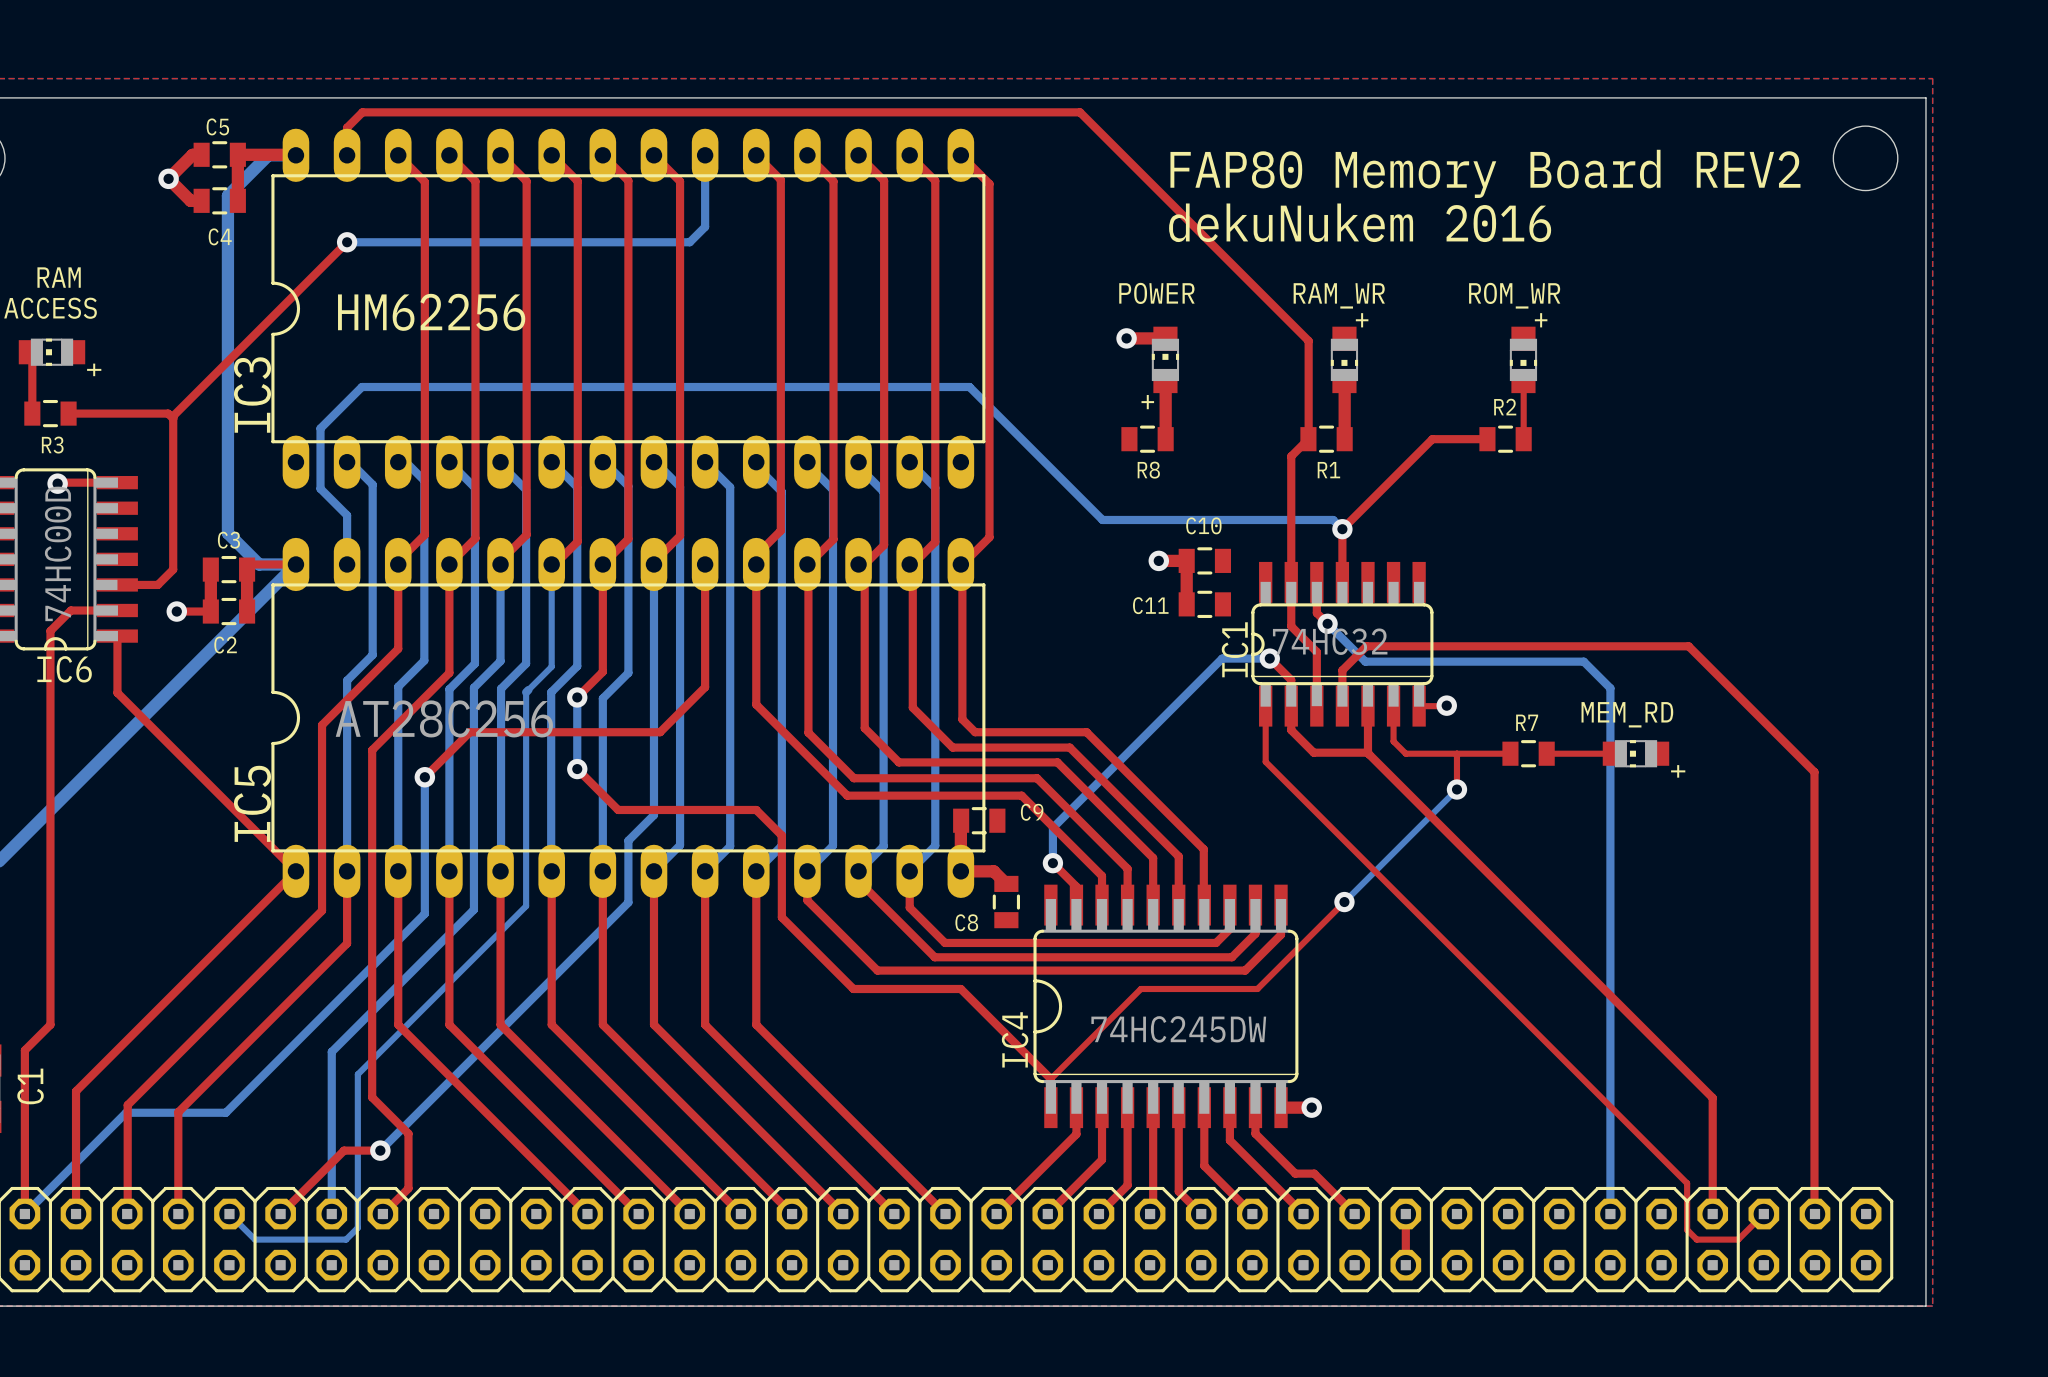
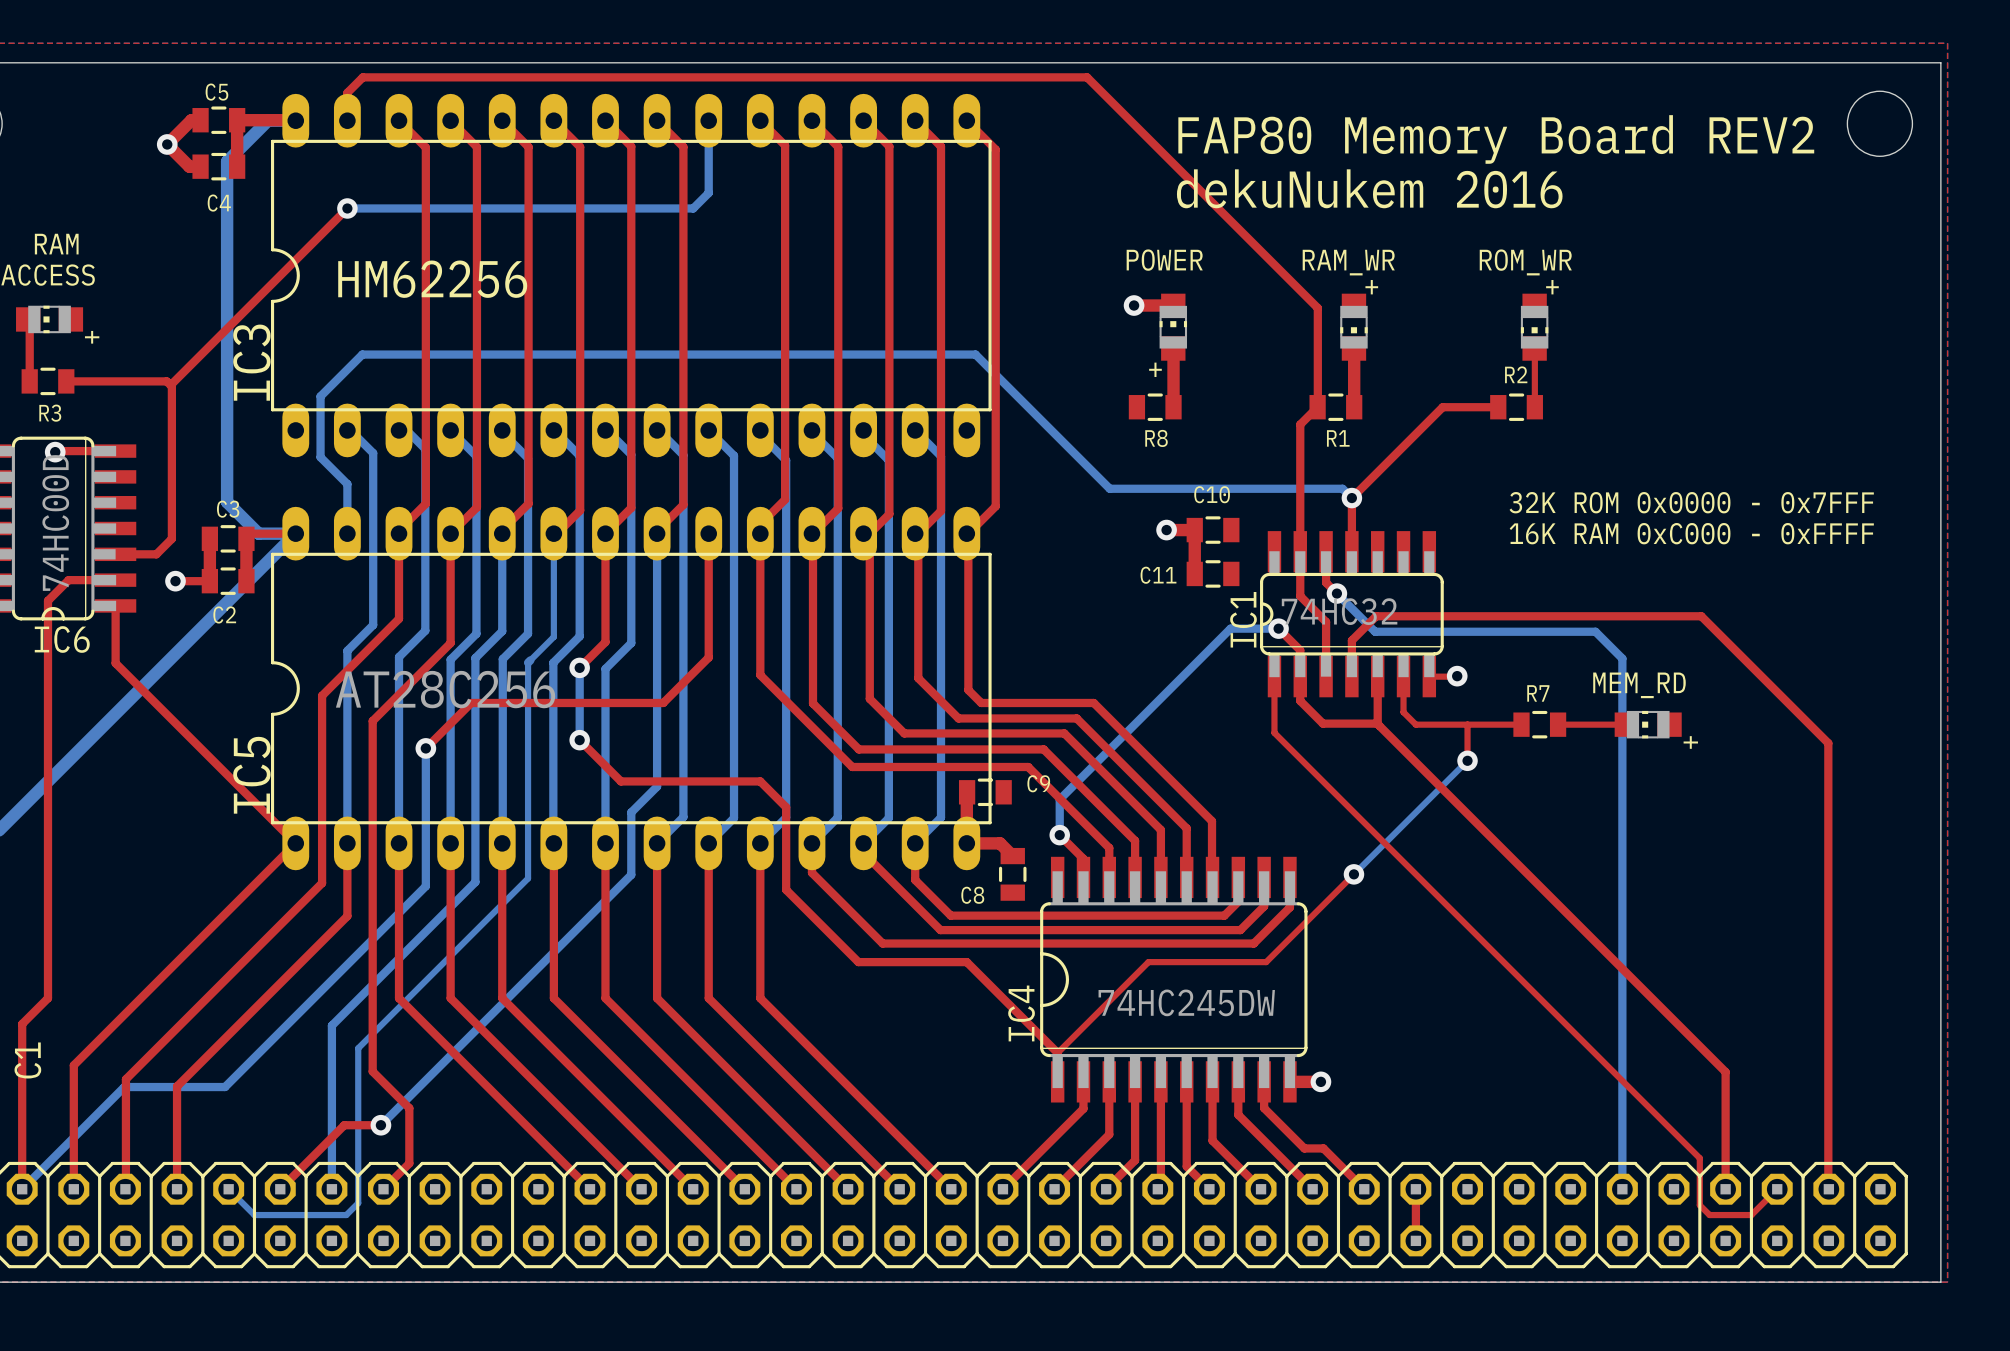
text: none -> 32K ROM 0x0000 - 0x7FFF (1691, 502)
text: none -> 16K RAM 0xC000 - 0xFFFF (1691, 533)

